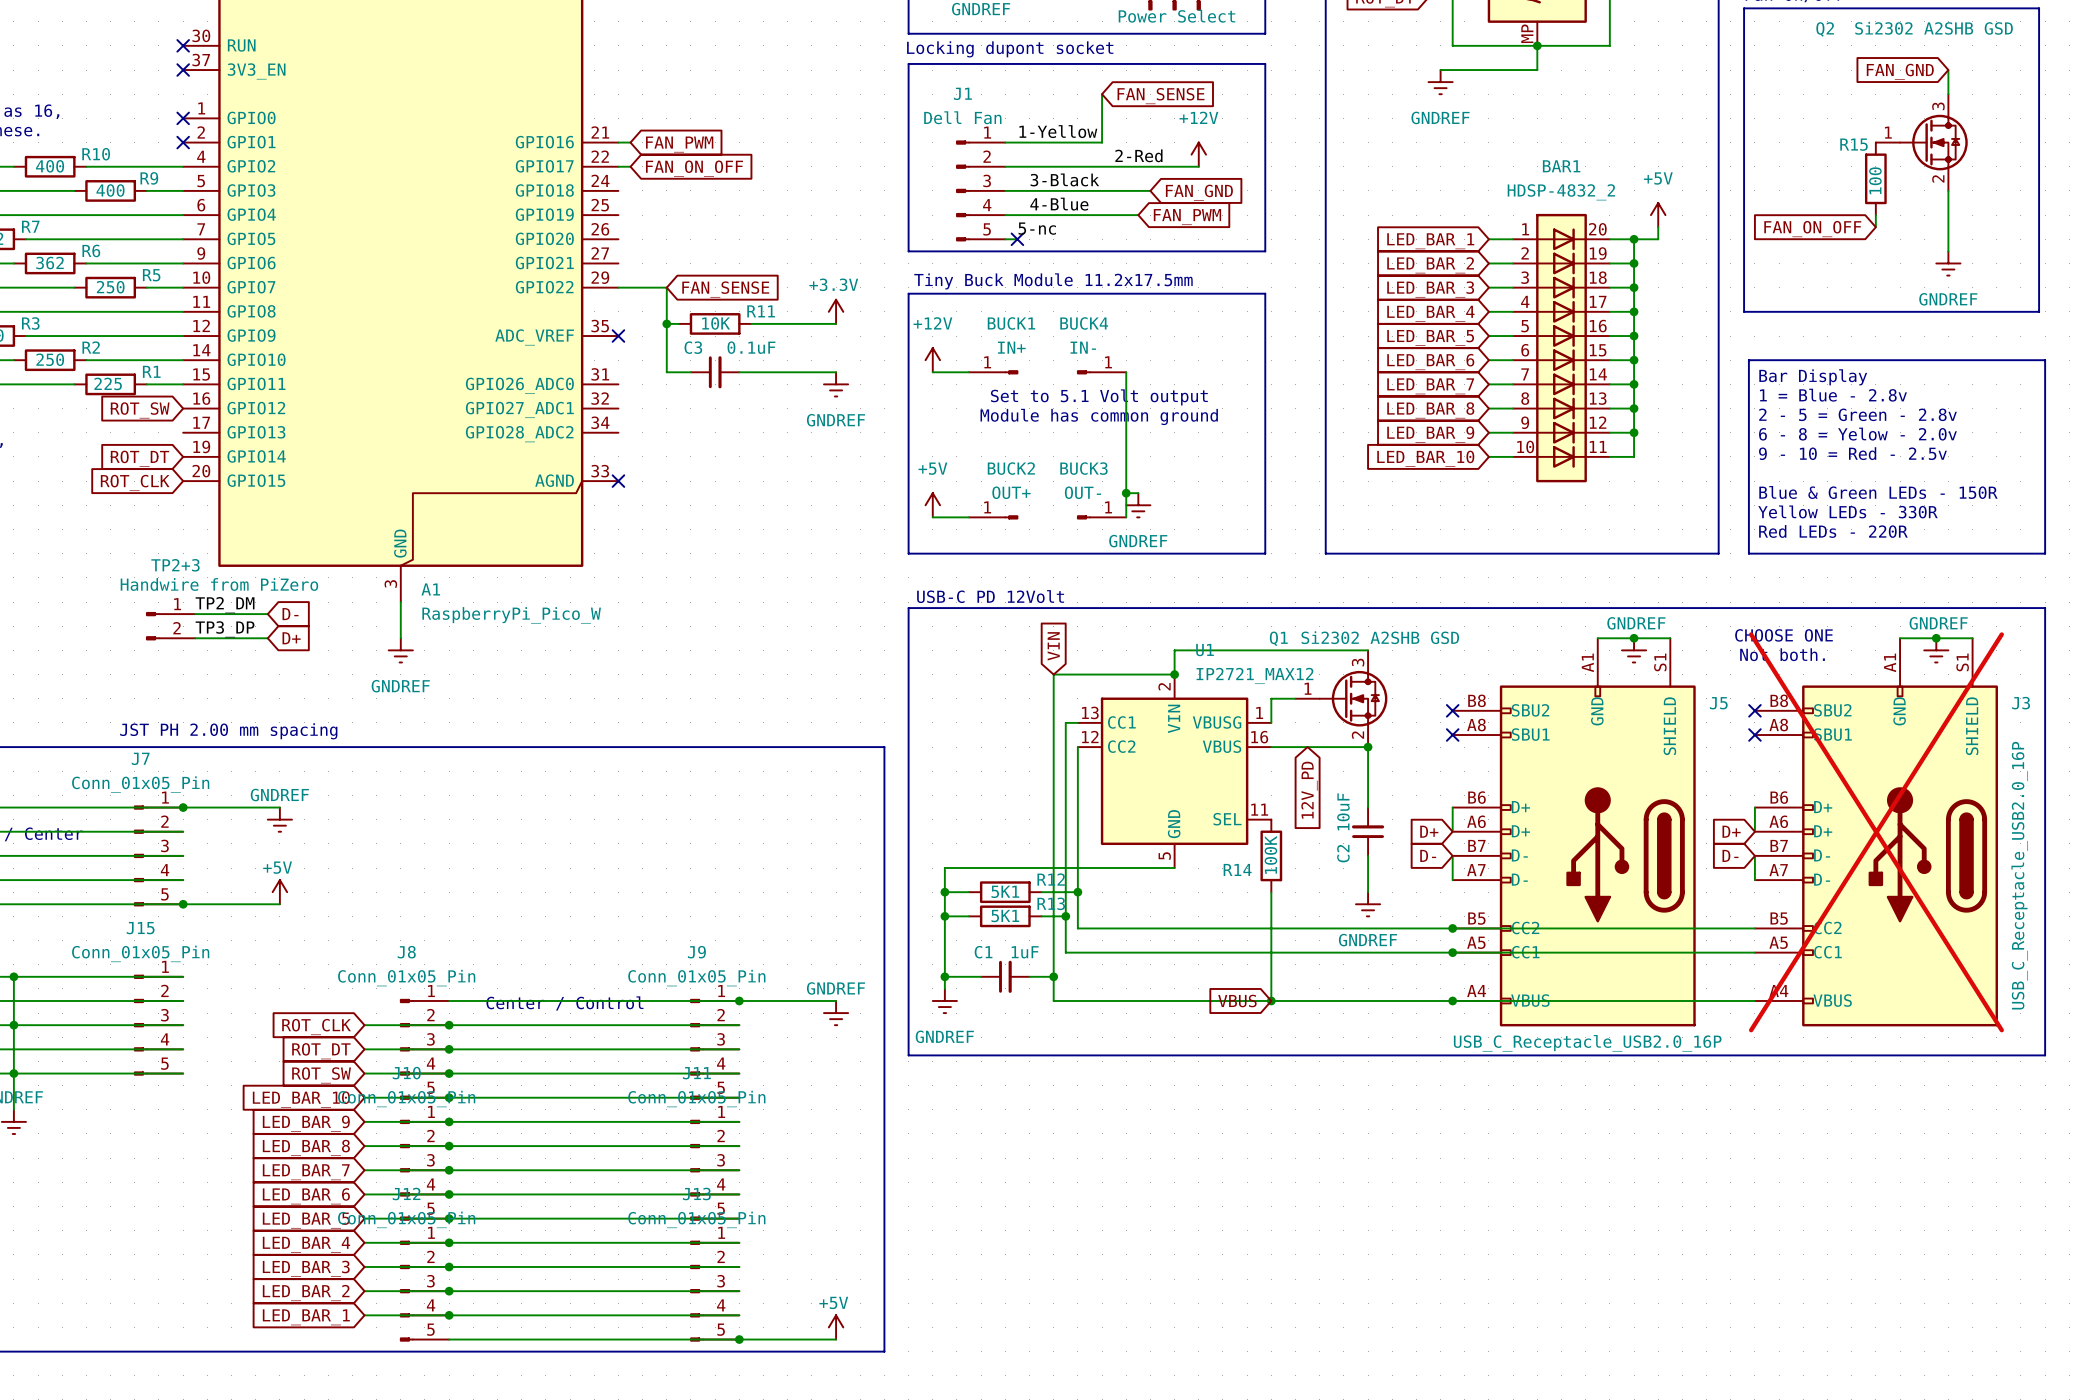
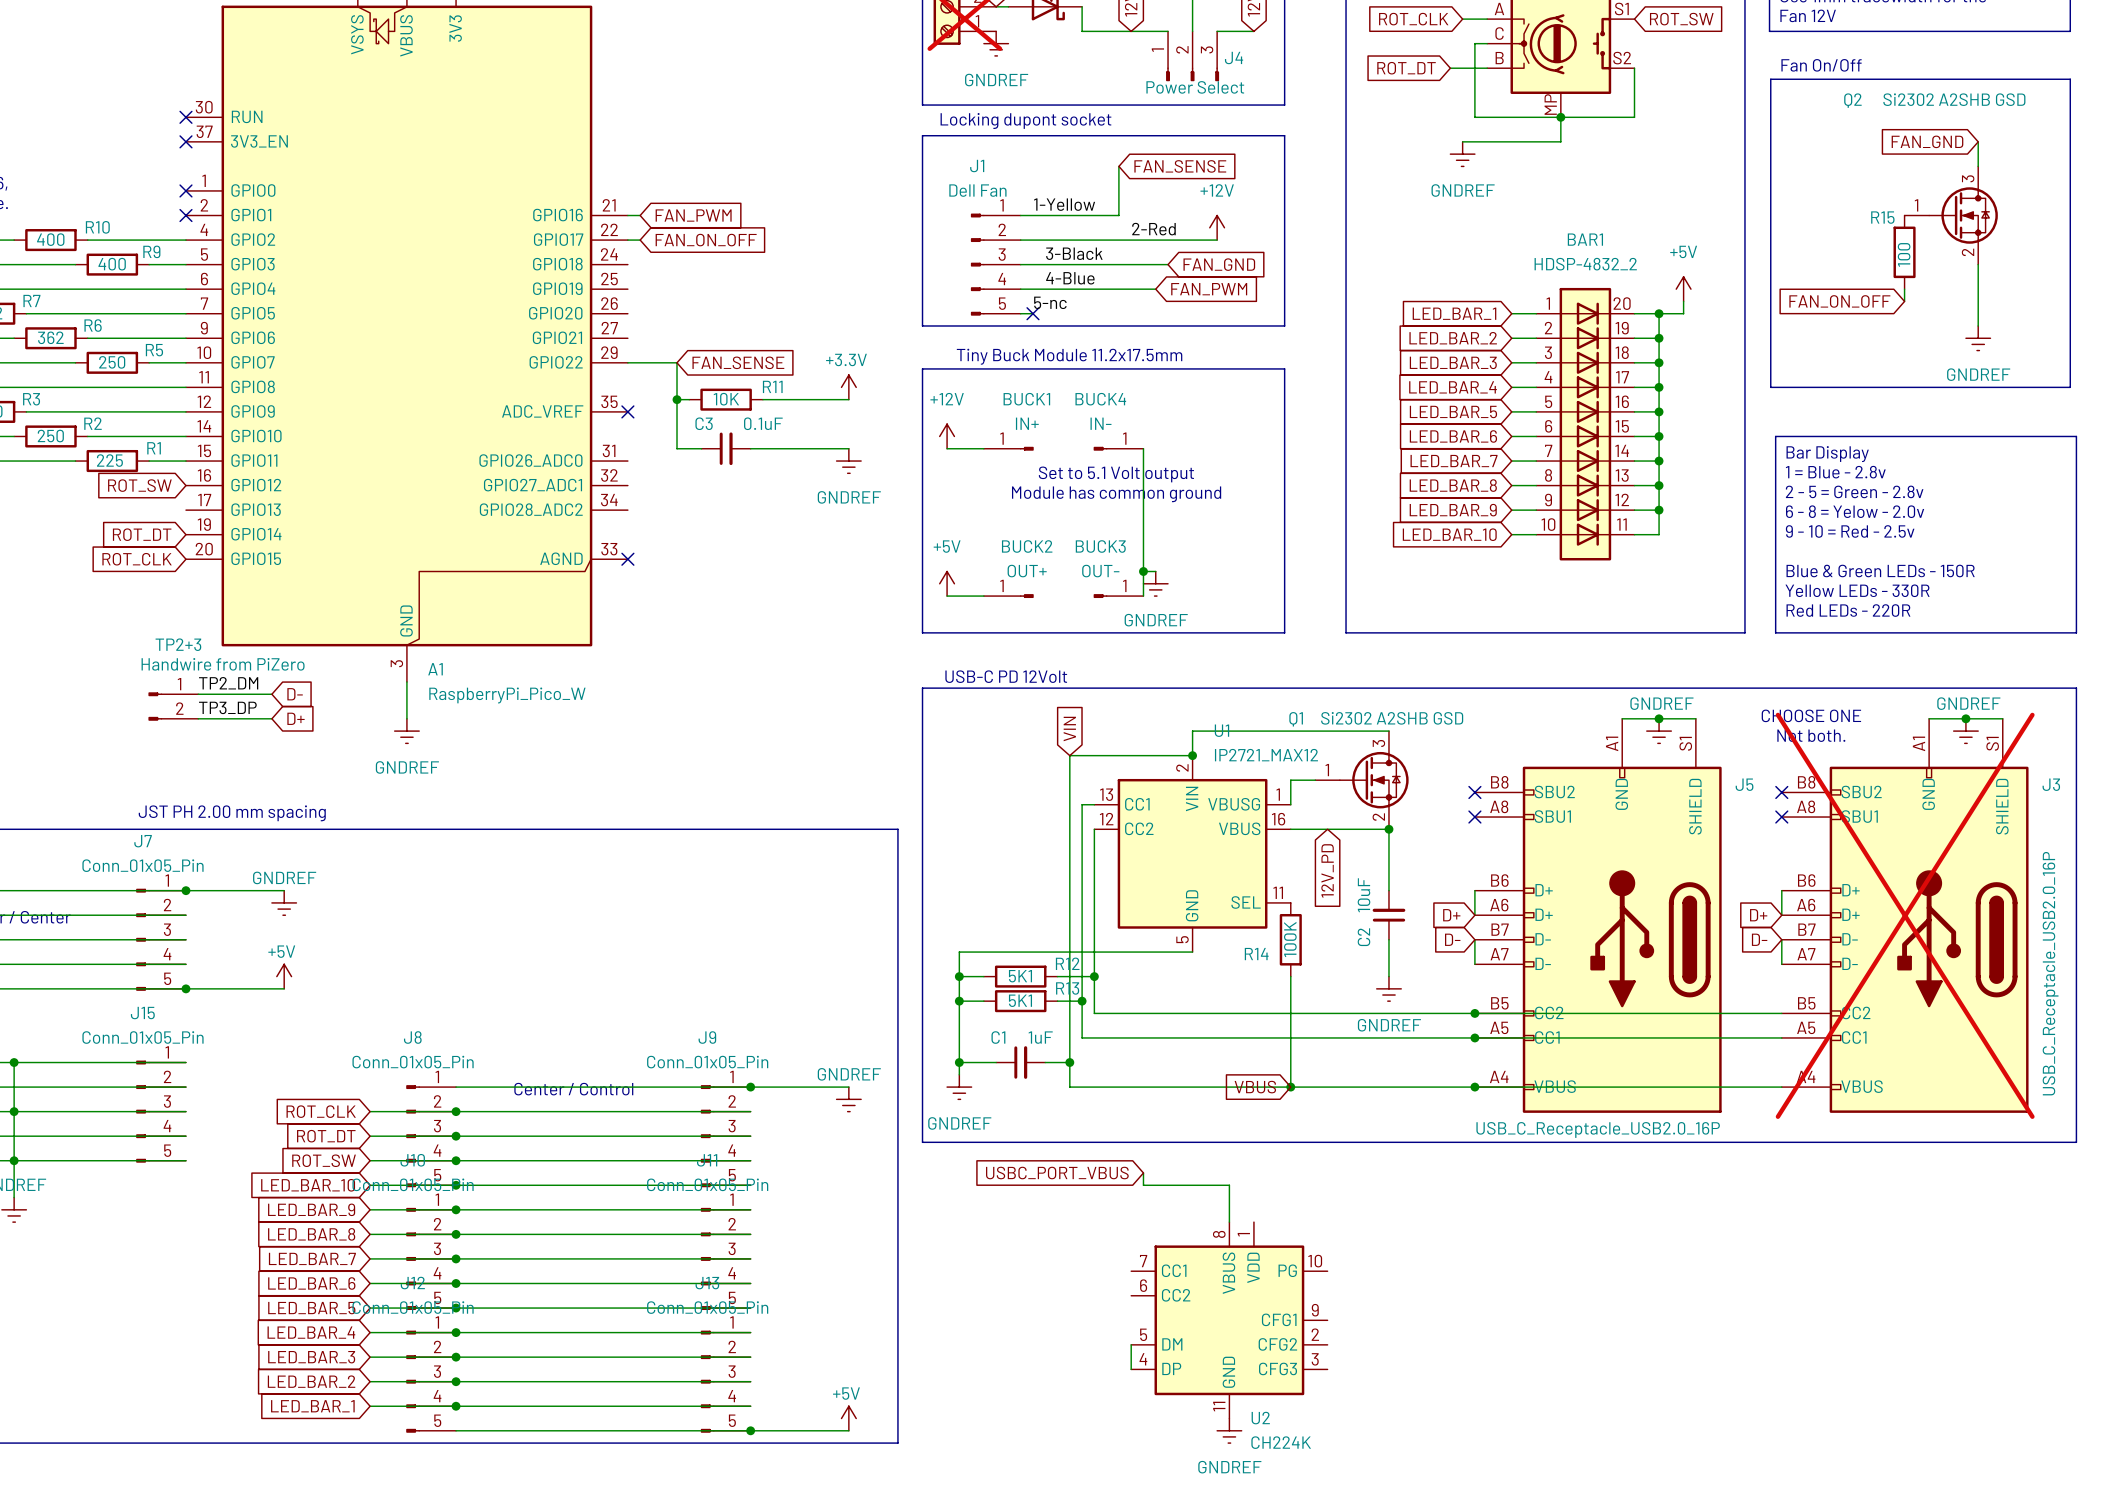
wire: none -> (1143, 1173) (1143, 1185) (1229, 1185) (1229, 1222)
global label: none -> USBC_PORT_VBUS (1057, 1173)
U2: none -> CH224K (1229, 1320)
wire: none -> (1131, 1344) (1131, 1369)
power symbol: none -> GNDREF (1229, 1430)

